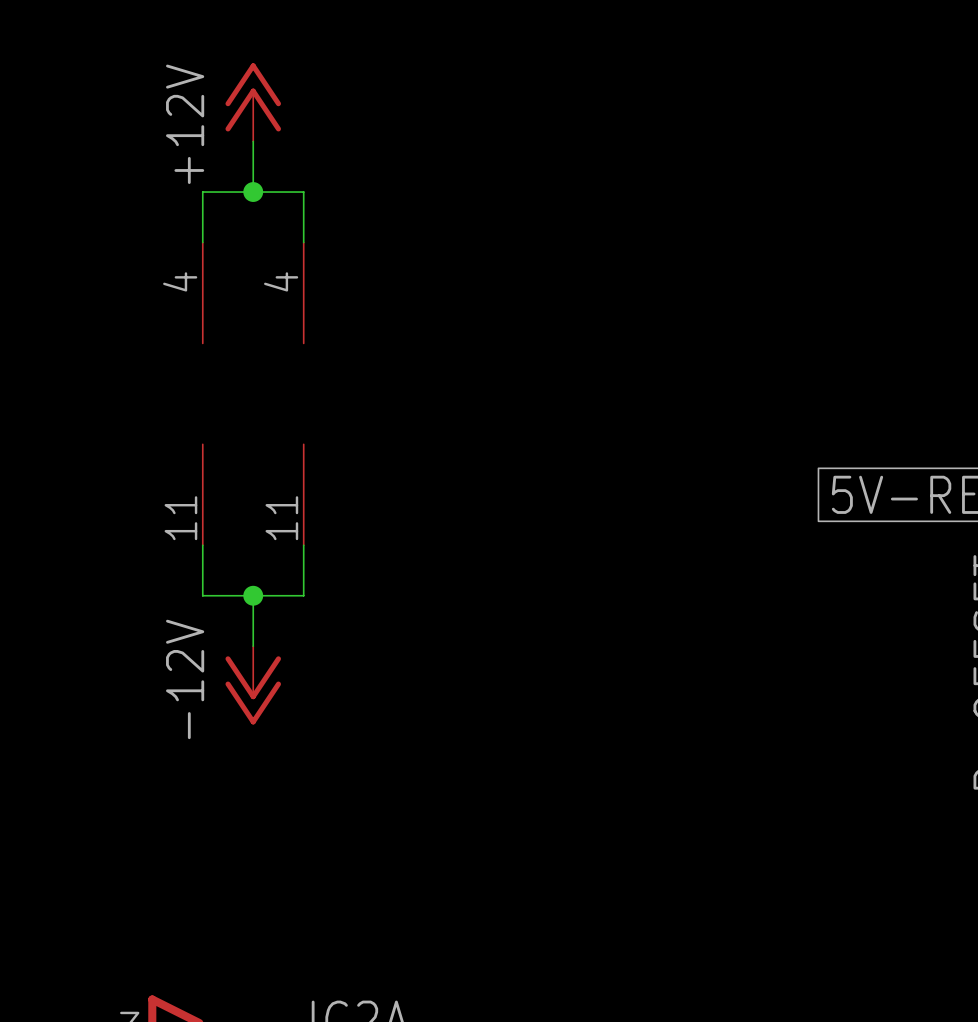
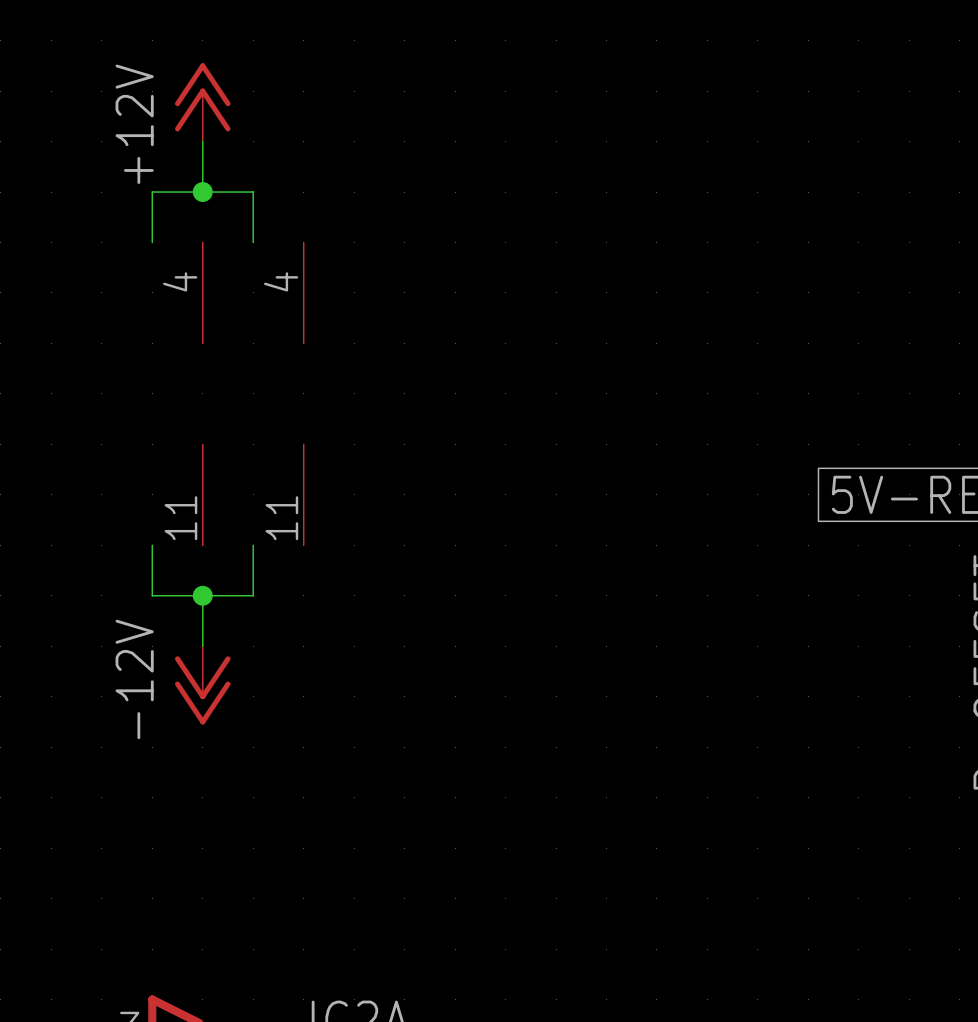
power symbol position: +12V (253, 102) -> +12V (202, 102)
wire: (253, 141) (253, 192) (303, 192) (303, 242) -> (152, 545) (152, 595) (202, 595) (202, 646)
wire: (202, 192) (202, 242) -> (253, 192) (253, 242)
junction position: (253, 192) -> (202, 192)
wire: (202, 545) (202, 595) -> (253, 545) (253, 595)
wire: (303, 545) (303, 595) (253, 595) (253, 646) -> (202, 141) (202, 192) (152, 192) (152, 242)
junction position: (253, 595) -> (202, 595)
power symbol position: -12V (253, 685) -> -12V (202, 685)

